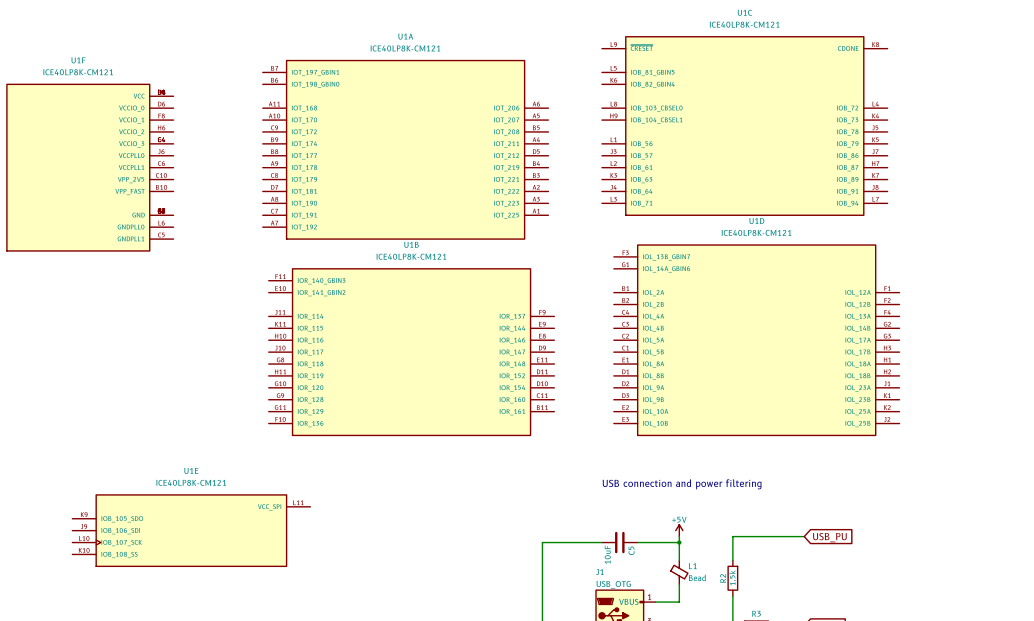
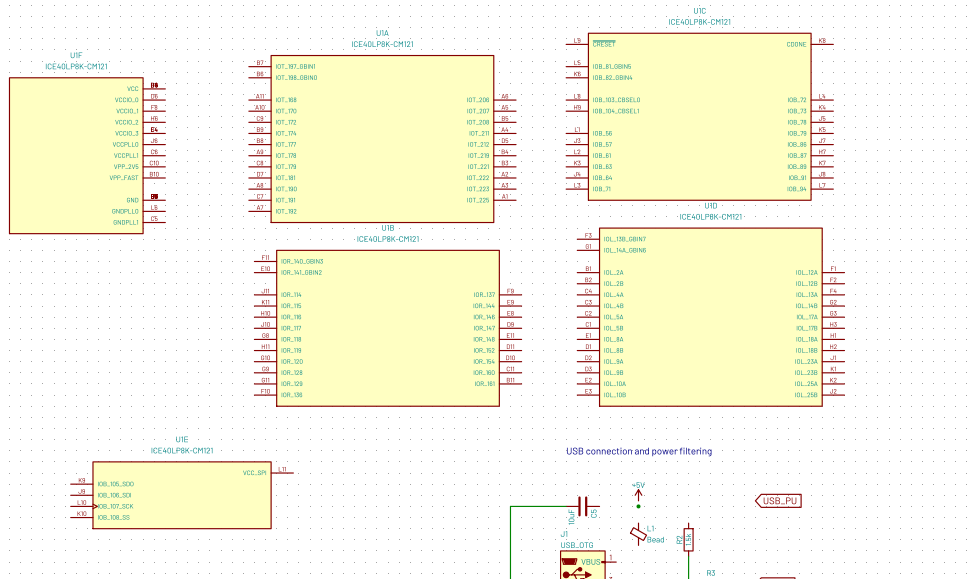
wire: (679, 536) (679, 560) -> none
wire: (804, 536) (732, 536) (732, 560) -> none
wire: (637, 542) (679, 542) -> none
wire: (679, 584) (679, 602) (655, 602) -> none

